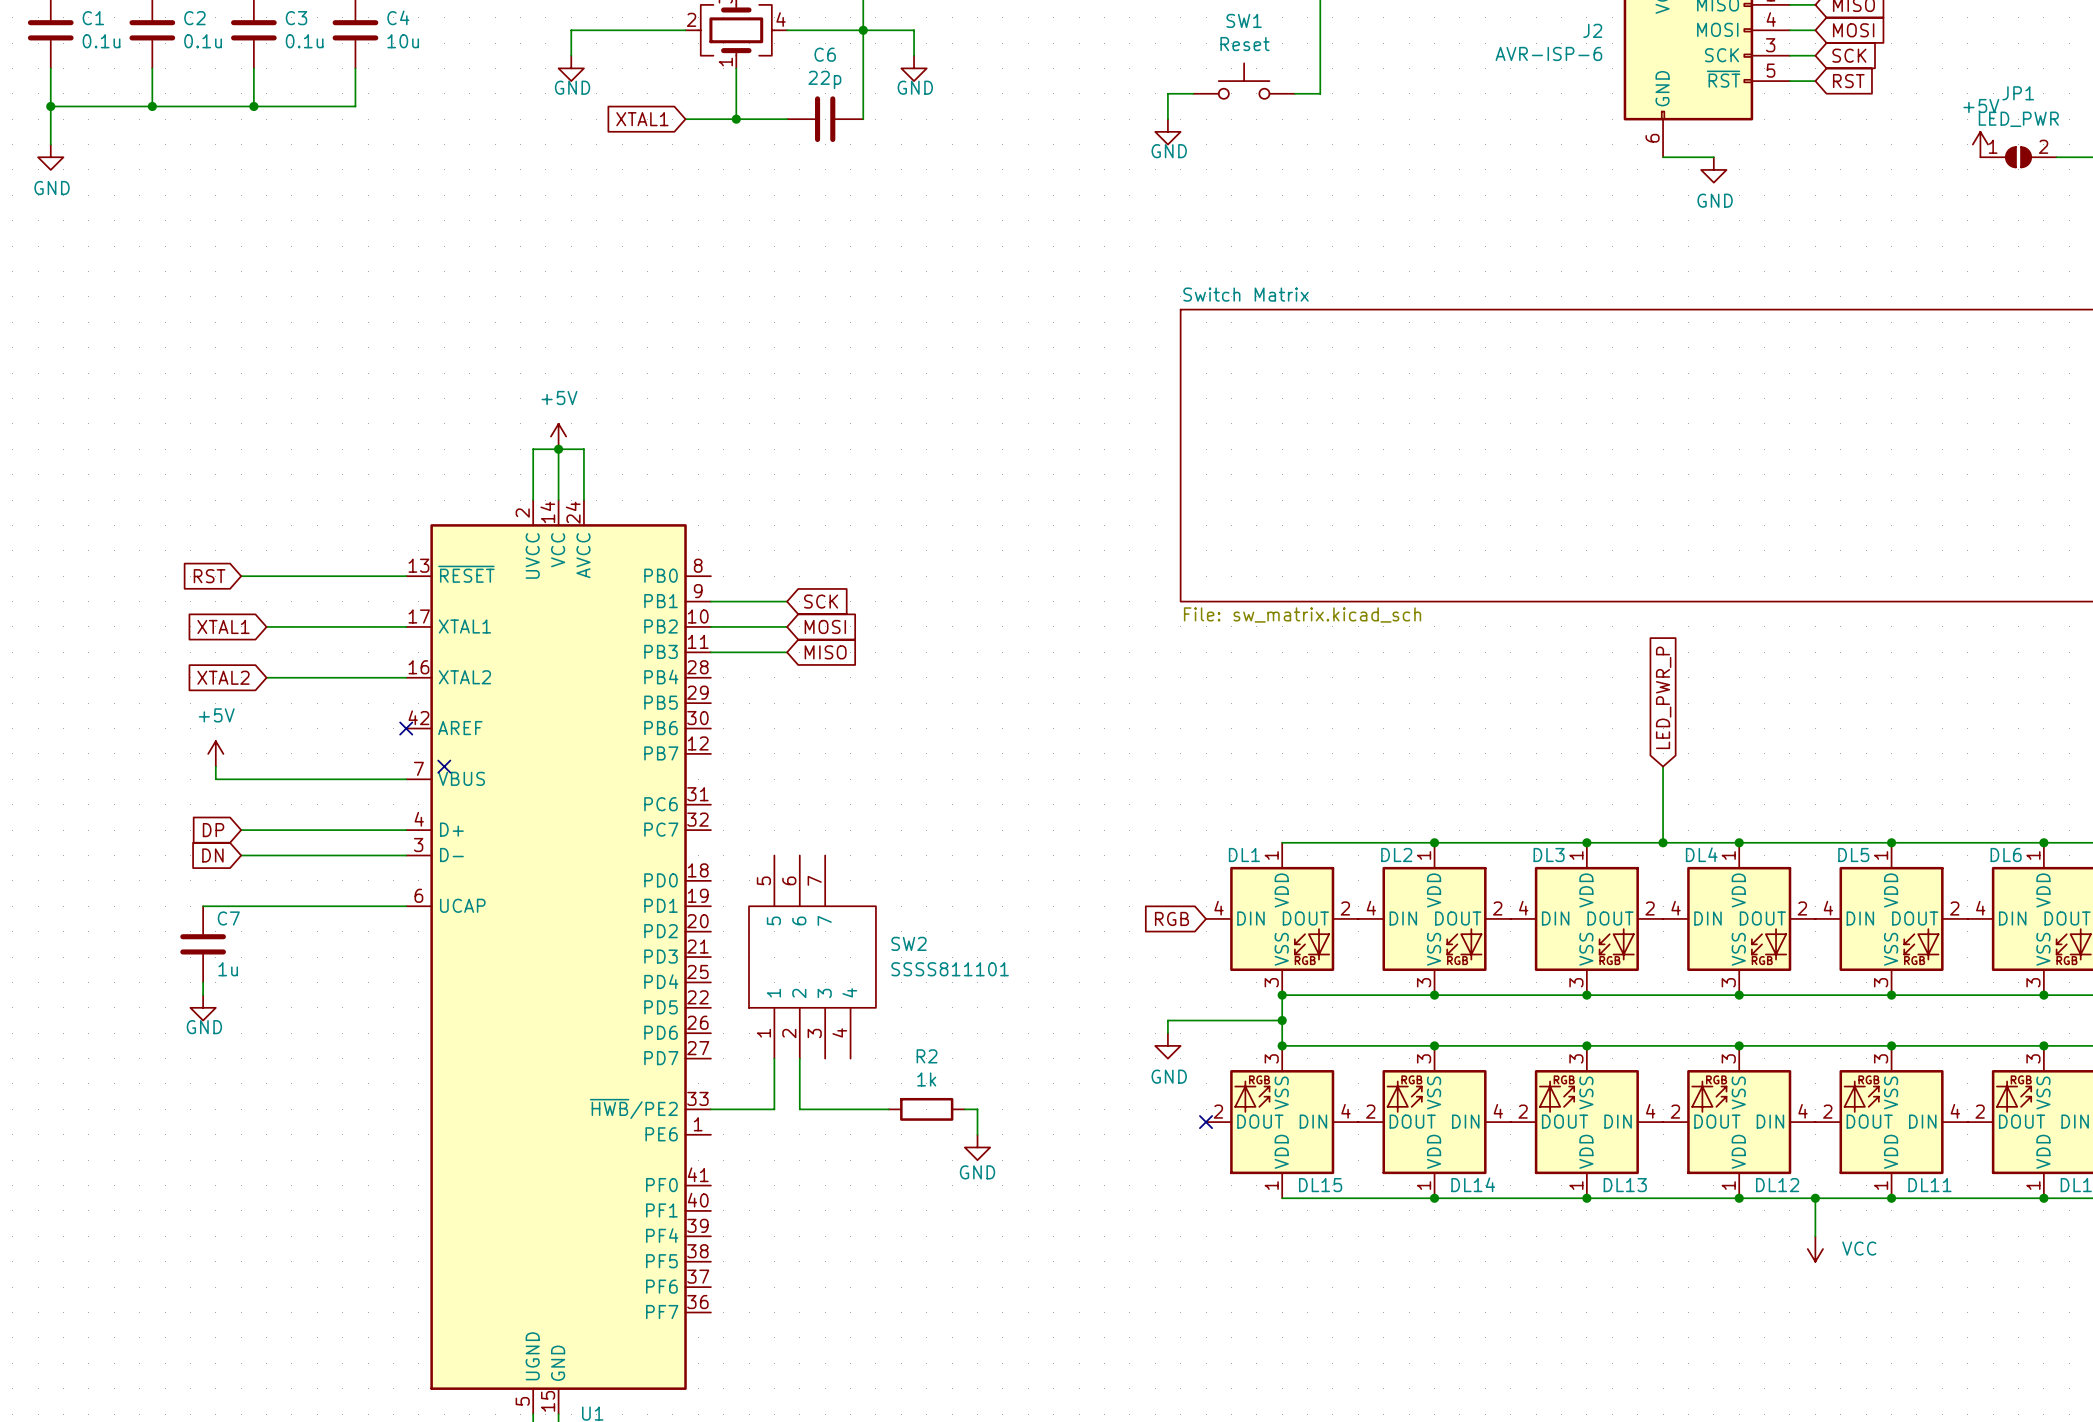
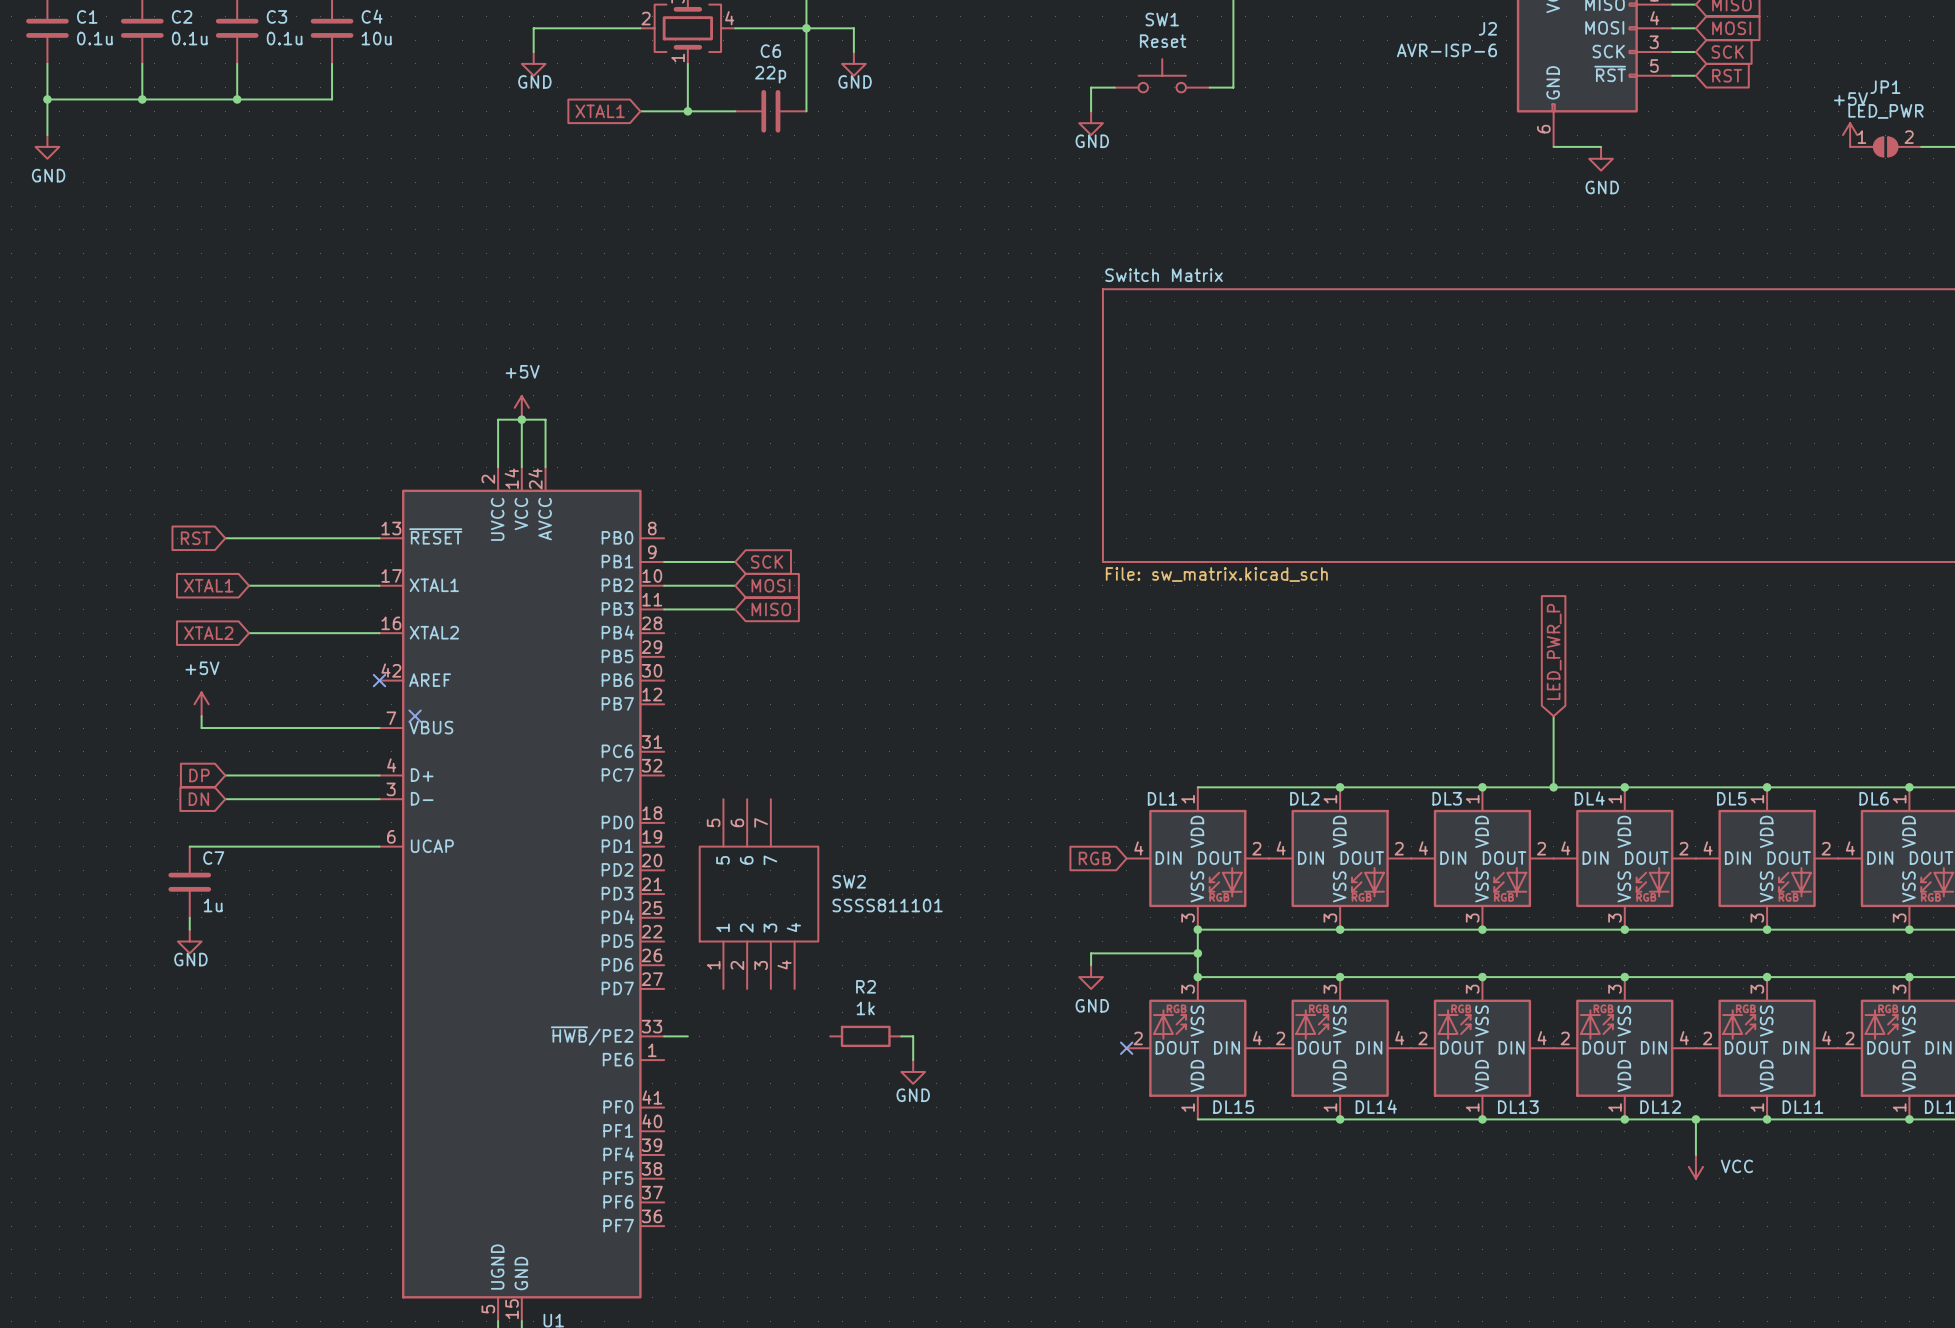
wire: (774, 1058) (774, 1109) (736, 1109) -> none
wire: (799, 1058) (799, 1109) (888, 1109) -> none

